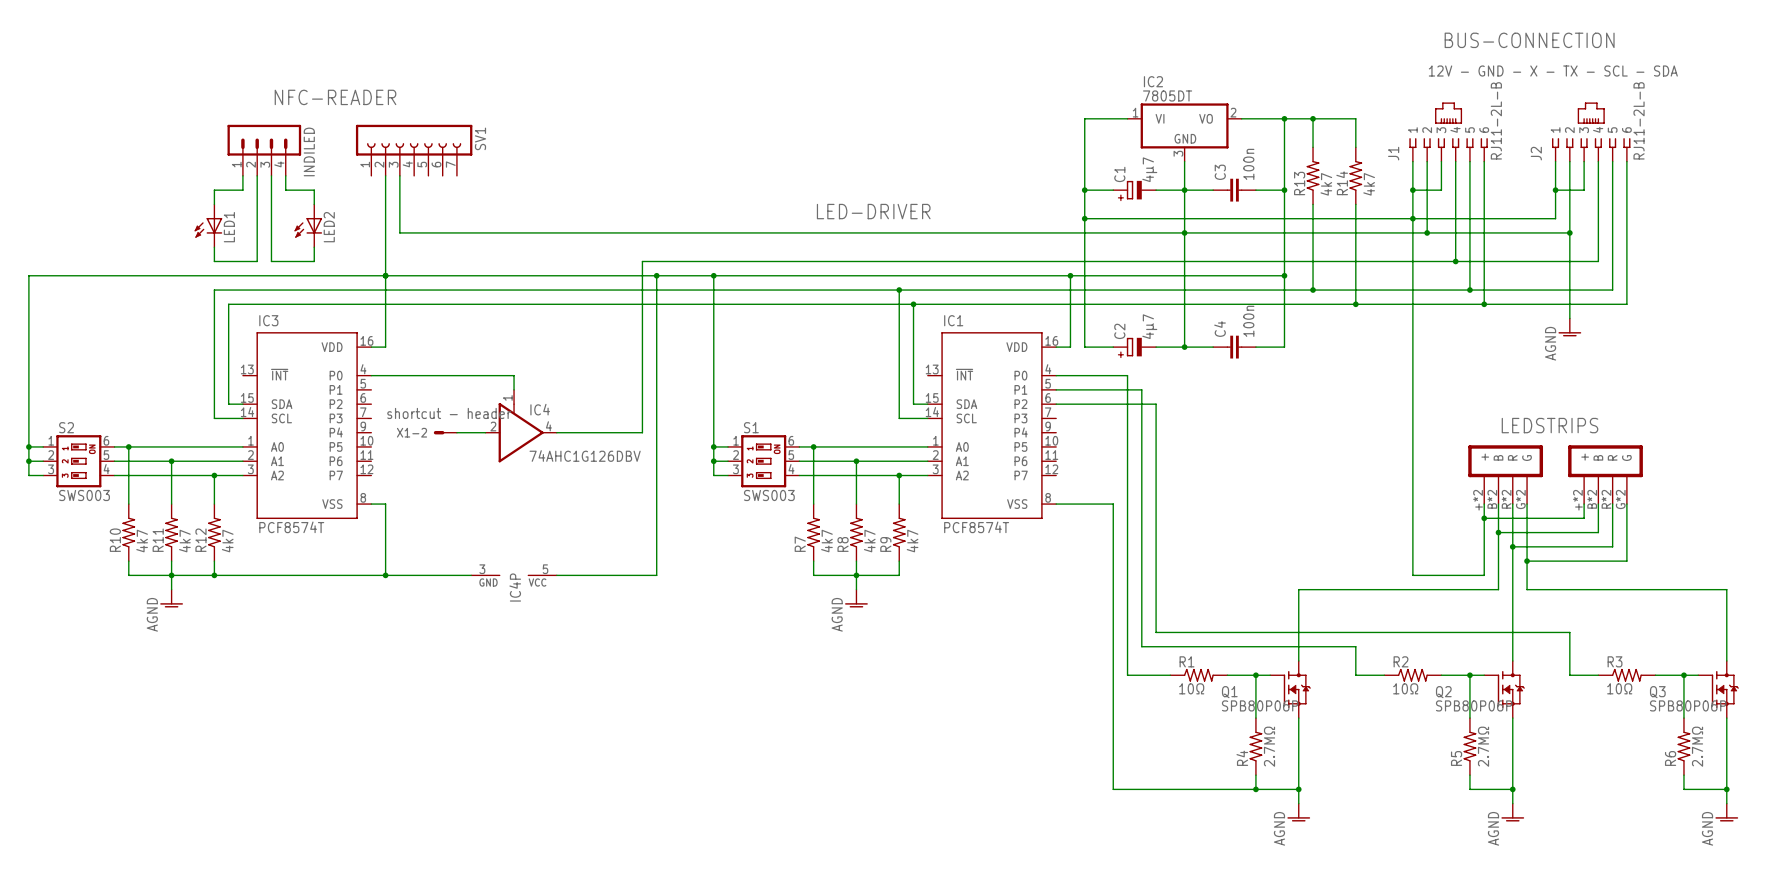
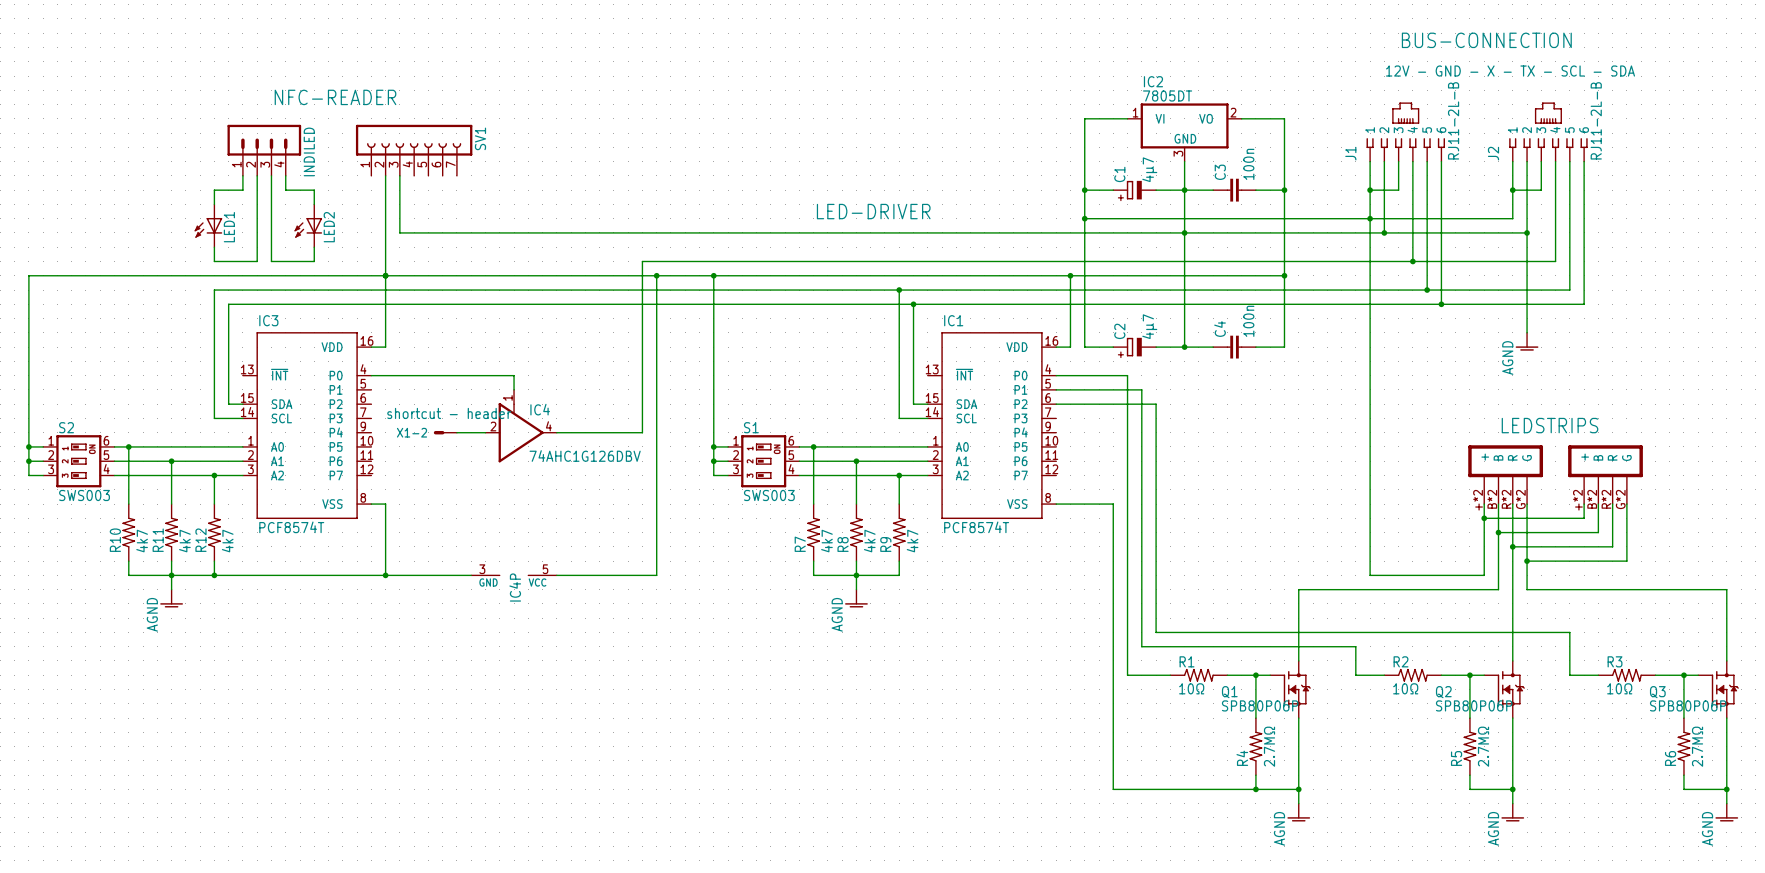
text position: BUS-CONNECTION (1529, 40) -> BUS-CONNECTION (1486, 40)
text position: 12V - GND - X - TX - SCL - SDA (1553, 71) -> 12V - GND - X - TX - SCL - SDA (1510, 71)
wire: (1284, 118) (1355, 118) (1355, 147) -> none
junction: (1284, 118) -> none
wire: (1313, 118) (1313, 147) -> none
junction: (1313, 118) -> none
J1 position: (1448, 132) -> (1405, 132)
J2 position: (1591, 132) -> (1548, 132)
wire: none -> (1384, 161) (1384, 232)
wire: none -> (1398, 161) (1398, 190) (1370, 190)
wire: (1455, 161) (1455, 261) -> none
wire: (1469, 161) (1469, 290) -> none
wire: (1484, 161) (1484, 304) -> none
wire: none -> (1512, 161) (1512, 218)
wire: none -> (1527, 161) (1527, 332)
wire: none -> (1541, 161) (1541, 190) (1512, 190)
wire: (1598, 161) (1598, 261) (1555, 261) -> none
wire: (1612, 161) (1612, 290) (1569, 290) (1569, 318) -> none
wire: (1626, 161) (1626, 304) (1584, 304) -> (1584, 190) (1584, 304)
R13: 4k7 (1313, 175) -> none
R14: 4k7 (1355, 175) -> none
junction: none -> (1370, 190)
wire: (1412, 190) (1441, 190) -> (1441, 304) (1441, 190)
junction: (1412, 190) -> none
junction: none -> (1512, 190)
wire: (1555, 190) (1584, 190) -> none
junction: (1555, 190) -> none
wire: (1313, 204) (1313, 290) -> none
wire: (1355, 204) (1355, 304) -> none
junction: none -> (1370, 218)
junction: (1412, 218) -> none
wire: (1512, 218) (1555, 218) -> (1555, 261) (1555, 218)
junction: none -> (1384, 232)
wire: none -> (1427, 232) (1427, 290)
junction: (1427, 232) -> none
wire: (1527, 232) (1569, 232) -> none
junction: none -> (1527, 232)
junction: (1569, 232) -> none
wire: (1412, 261) (1412, 575) -> (1370, 161) (1370, 575) (1412, 575)
junction: none -> (1412, 261)
junction: (1455, 261) -> none
junction: (1313, 290) -> none
junction: none -> (1427, 290)
junction: (1469, 290) -> none
junction: (1355, 304) -> none
junction: none -> (1441, 304)
junction: (1484, 304) -> none
power symbol position: AGND (1569, 327) -> AGND (1527, 341)

